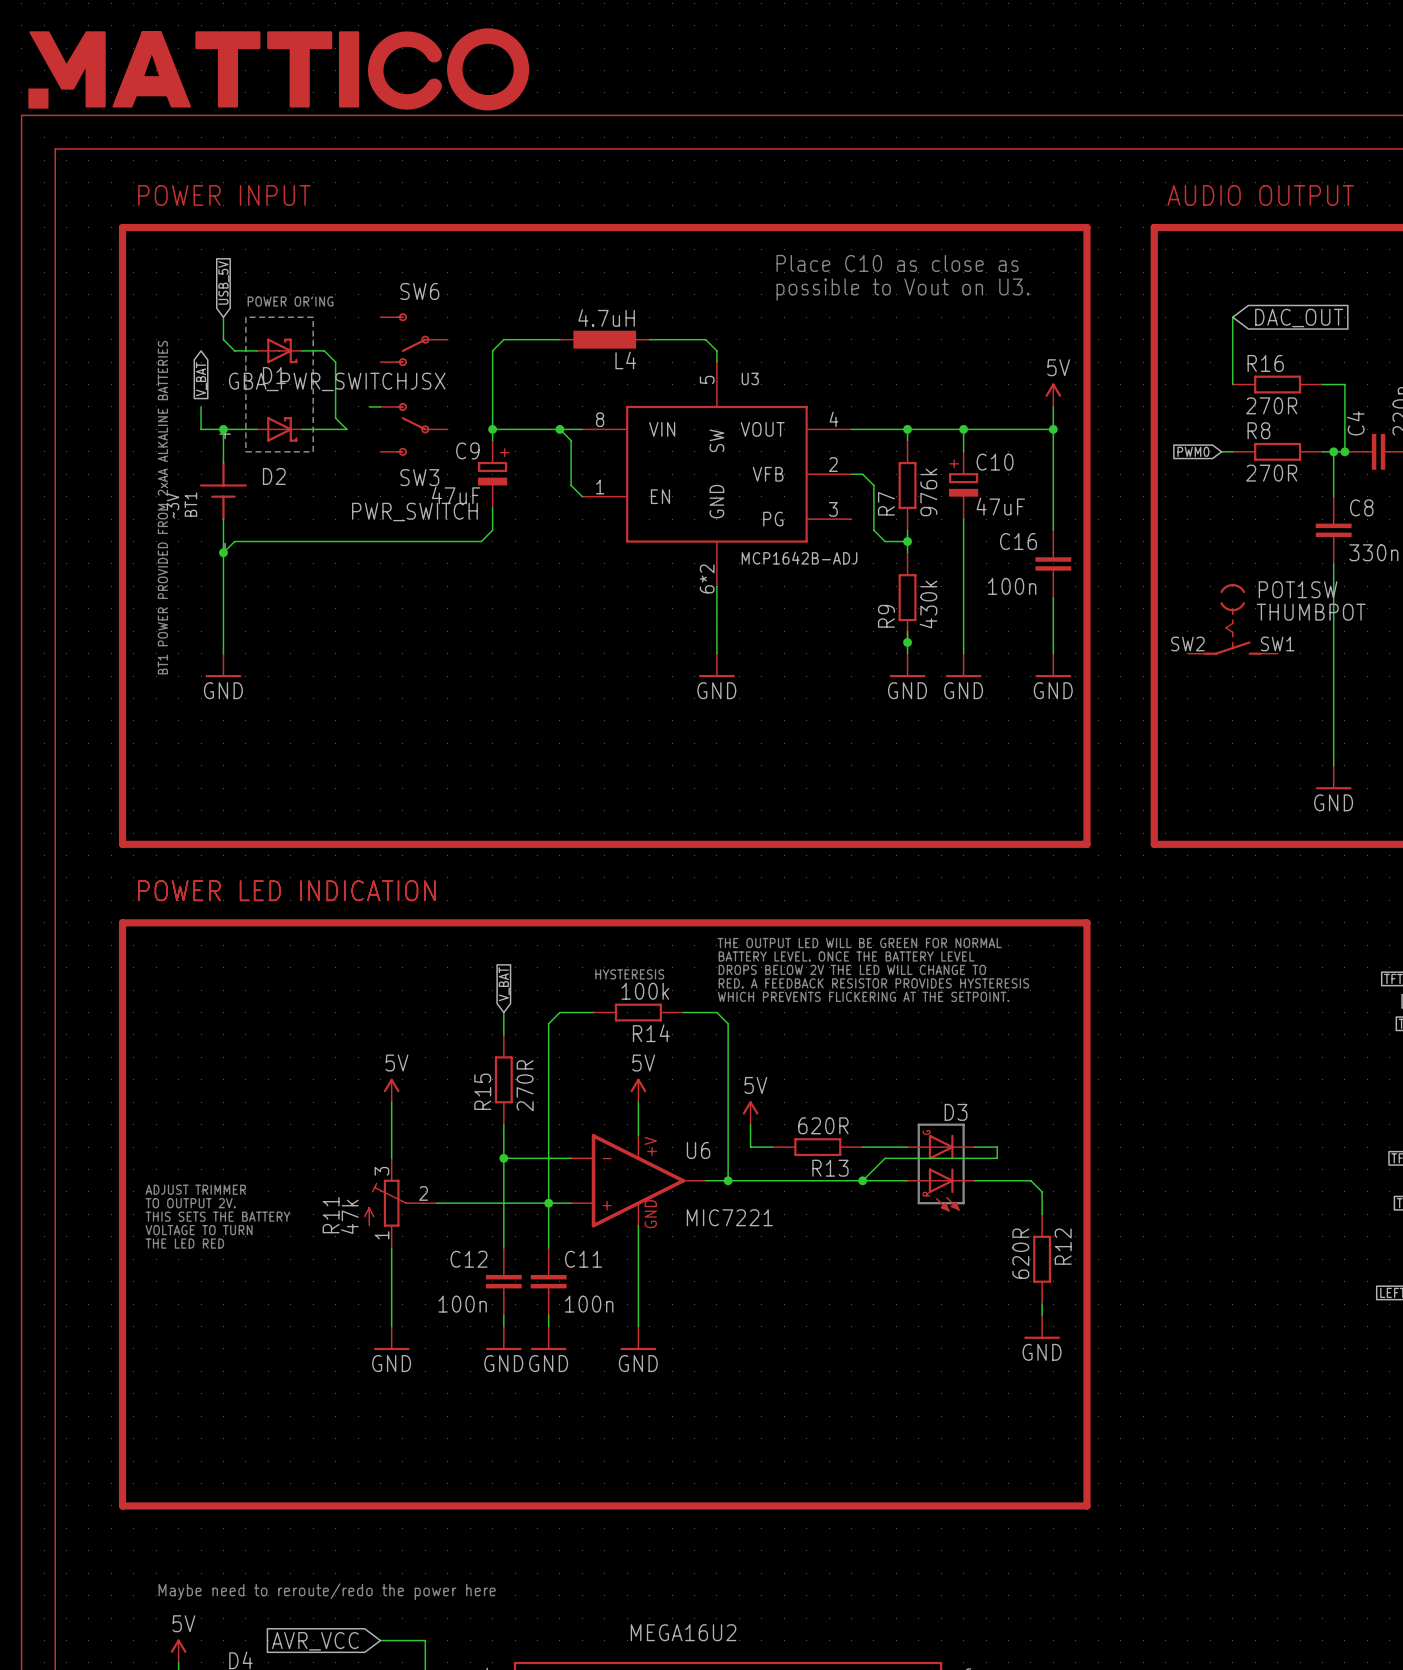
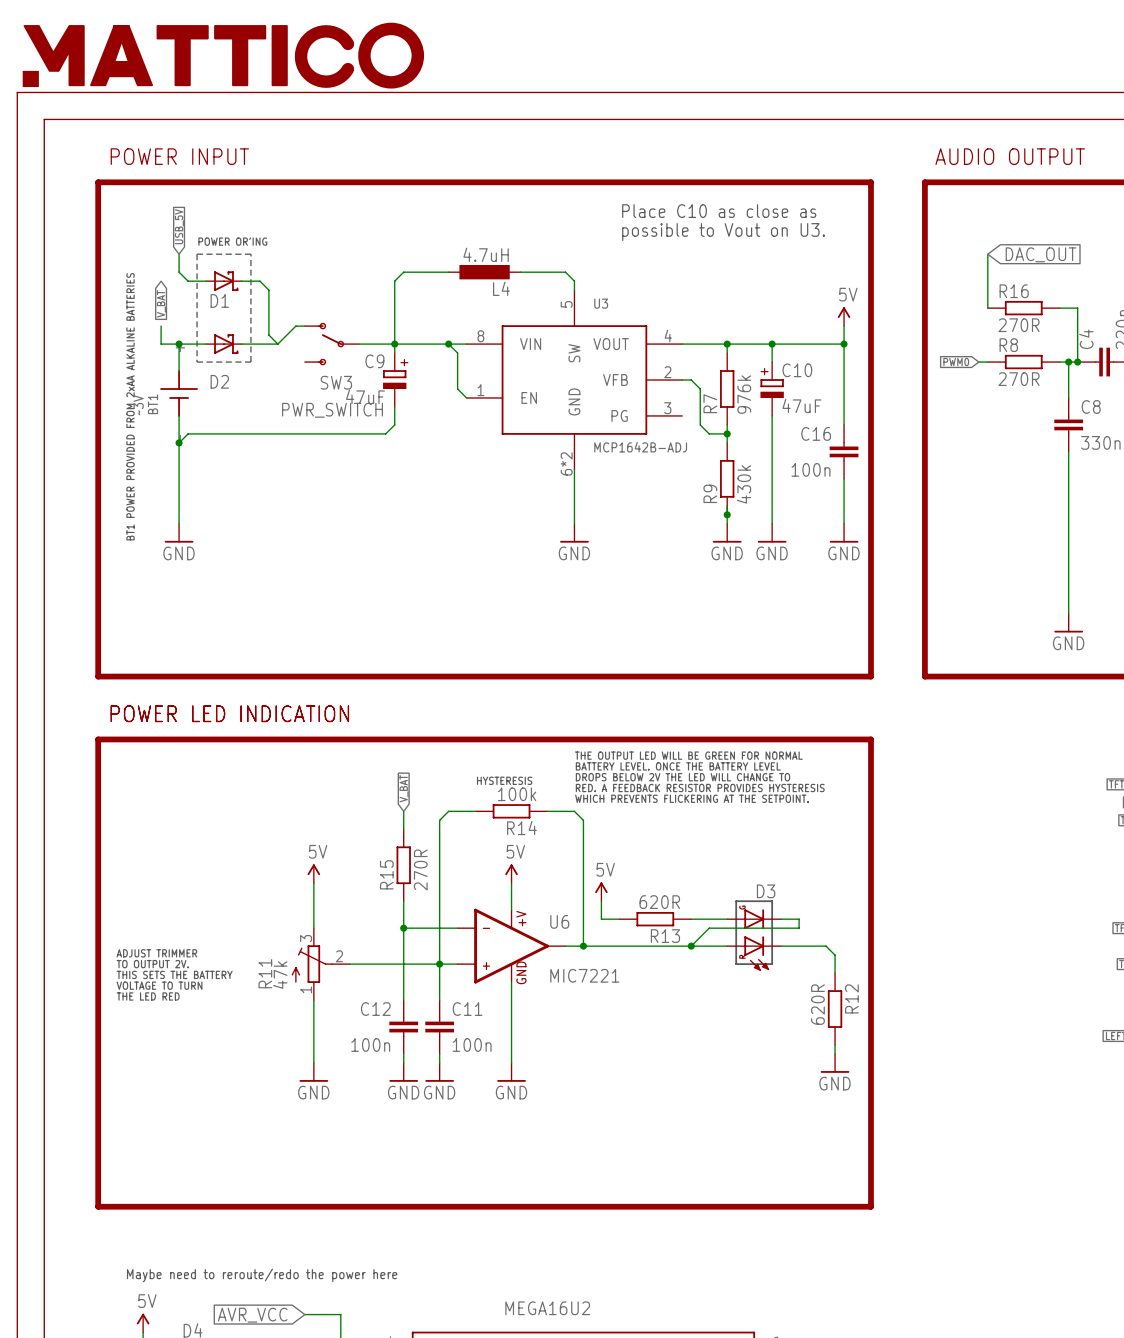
SW6: GBA_PWR_SWITCHJSX (414, 339) -> none
wire: none -> (295, 326) (277, 344)
wire: none -> (358, 344) (394, 344)
POT1SW: THUMBPOT (1232, 619) -> none

